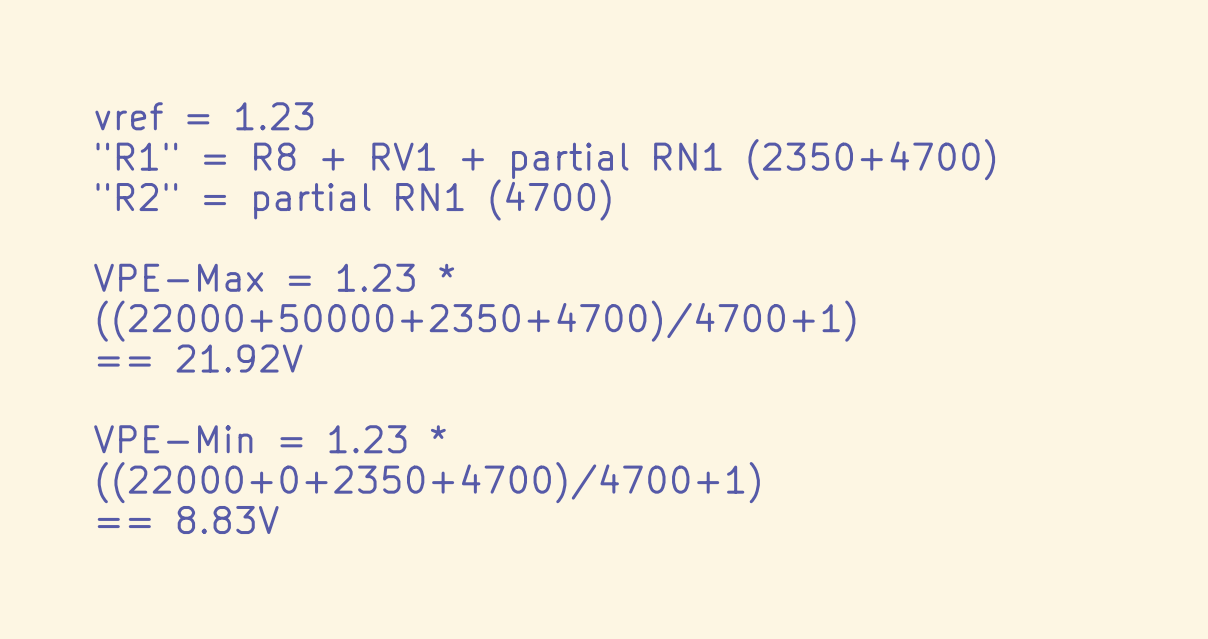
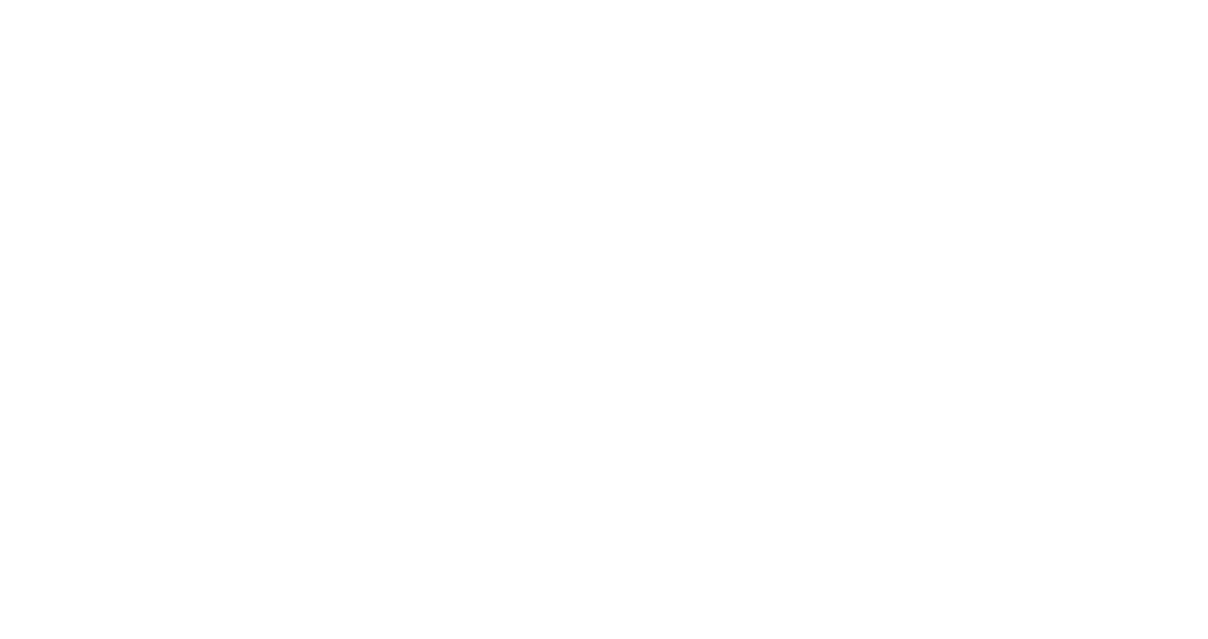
text: vref = 1.23 (204, 116) -> none
text: "R1" = R8 + RV1 + partial RN1 (2350+4700) (545, 159) -> none
text: "R2" = partial RN1 (4700) (353, 200) -> none
text: VPE-Max = 1.23 * (274, 277) -> none
text: ((22000+50000+2350+4700)/4700+1) (476, 321) -> none
text: == 21.92V (200, 358) -> none
text: VPE-Min = 1.23 * (269, 439) -> none
text: ((22000+0+2350+4700)/4700+1) (428, 482) -> none
text: == 8.83V (188, 520) -> none

